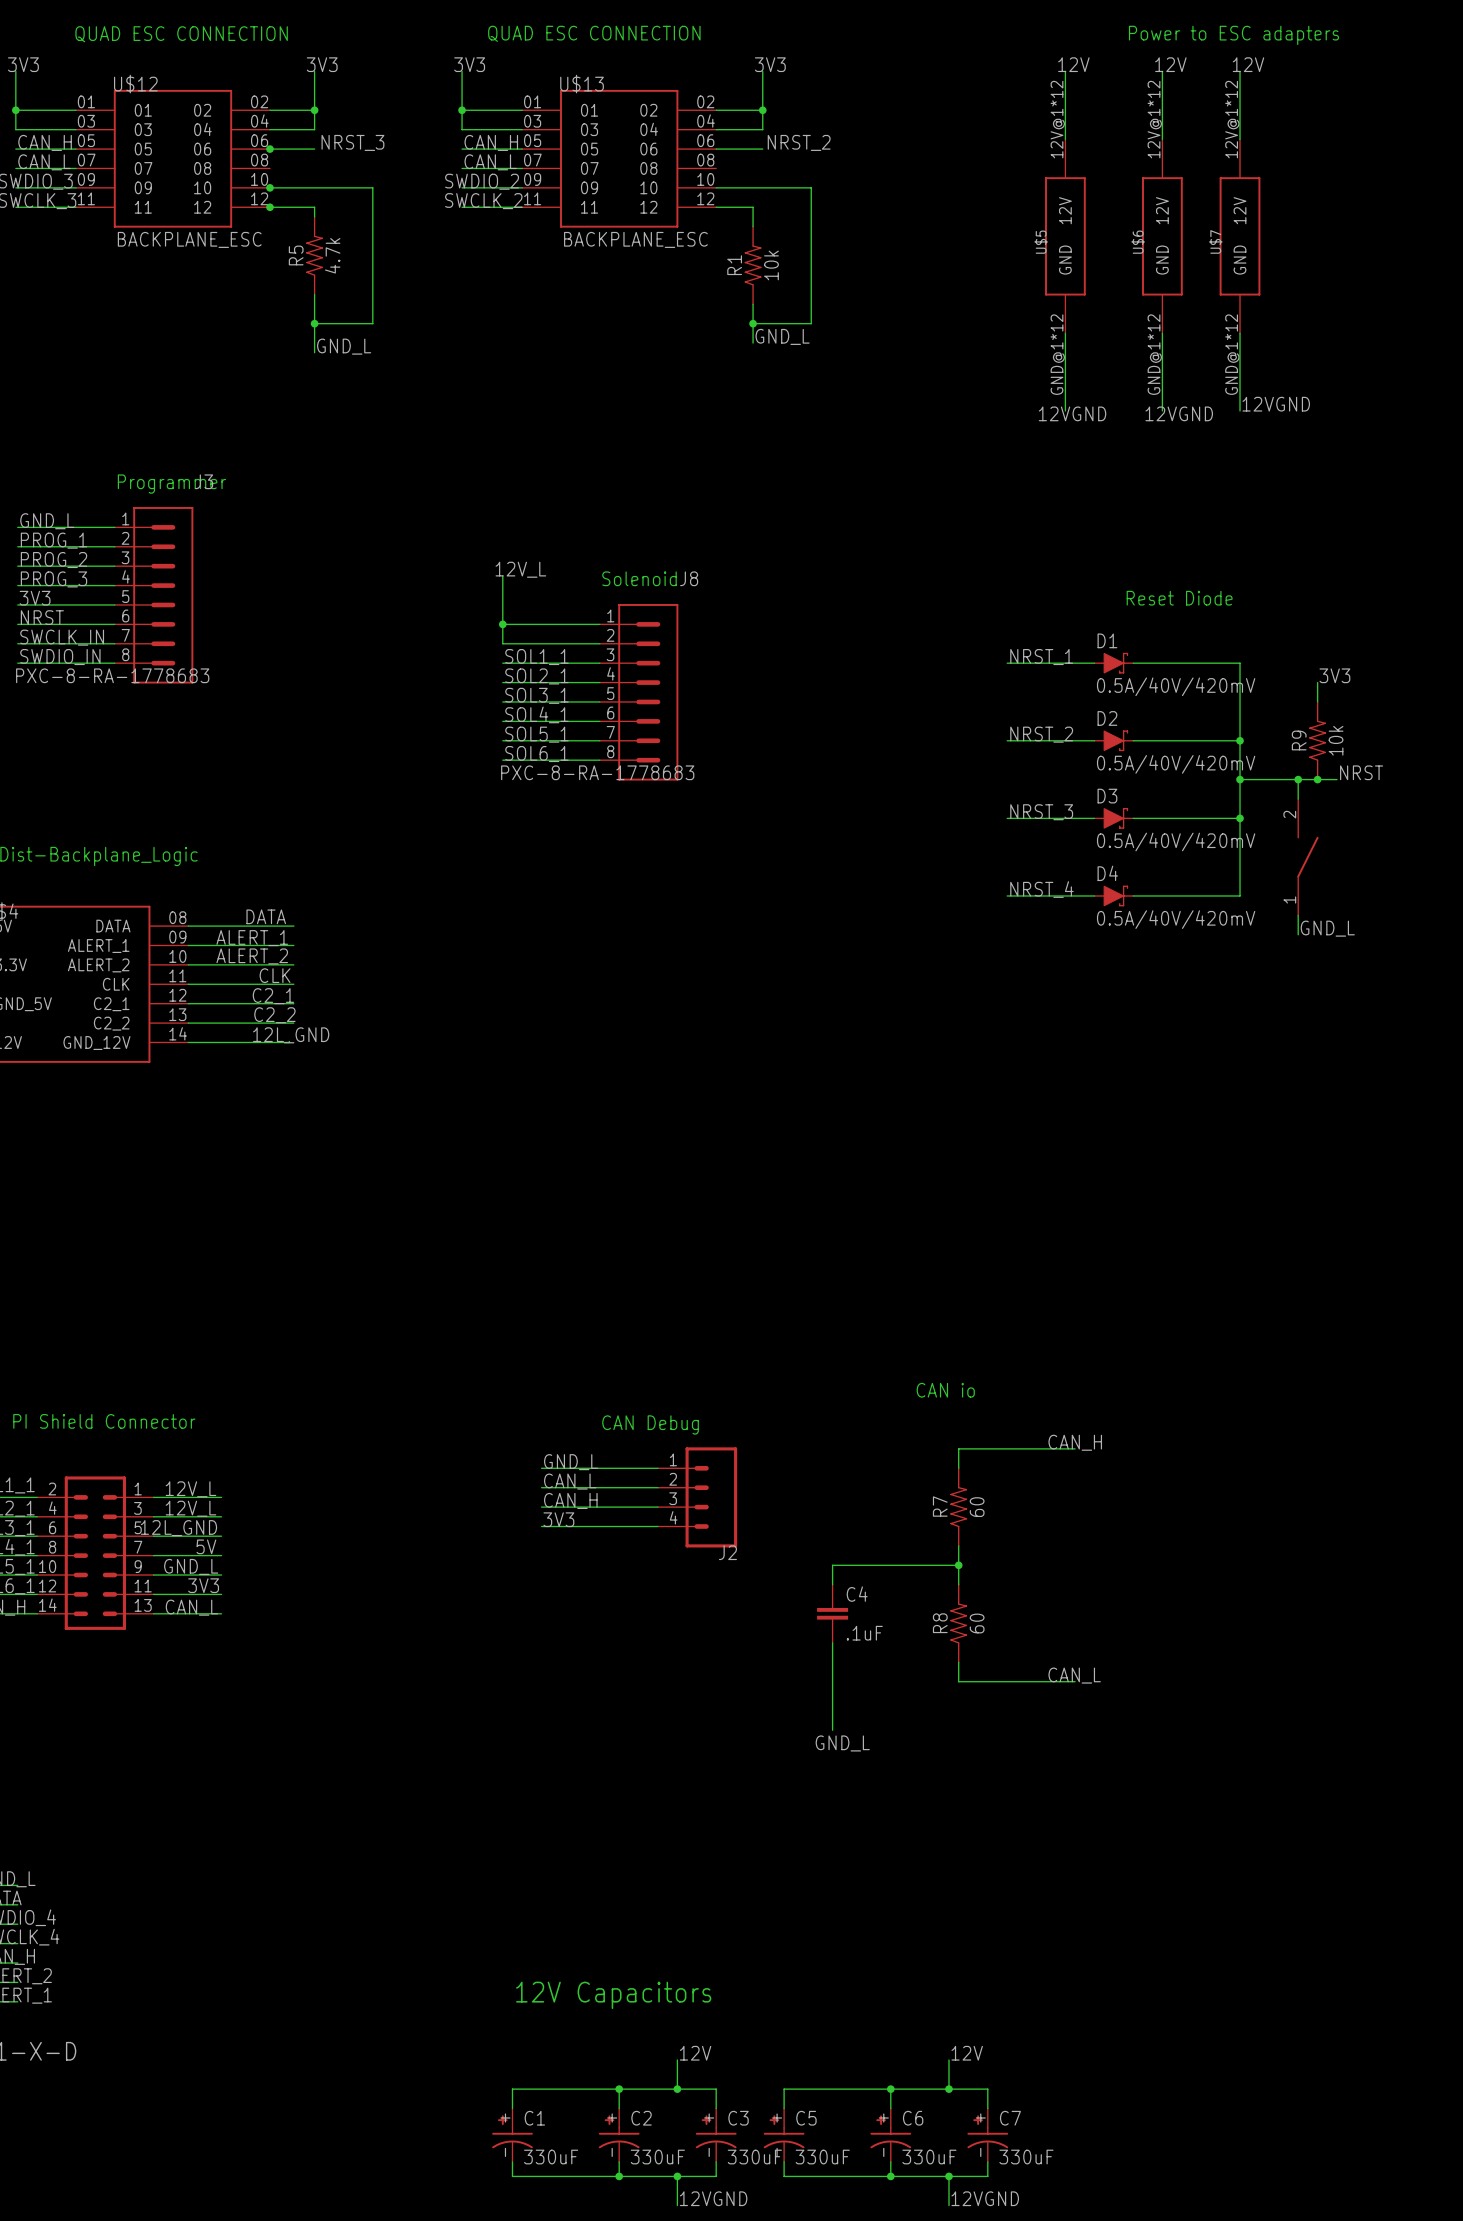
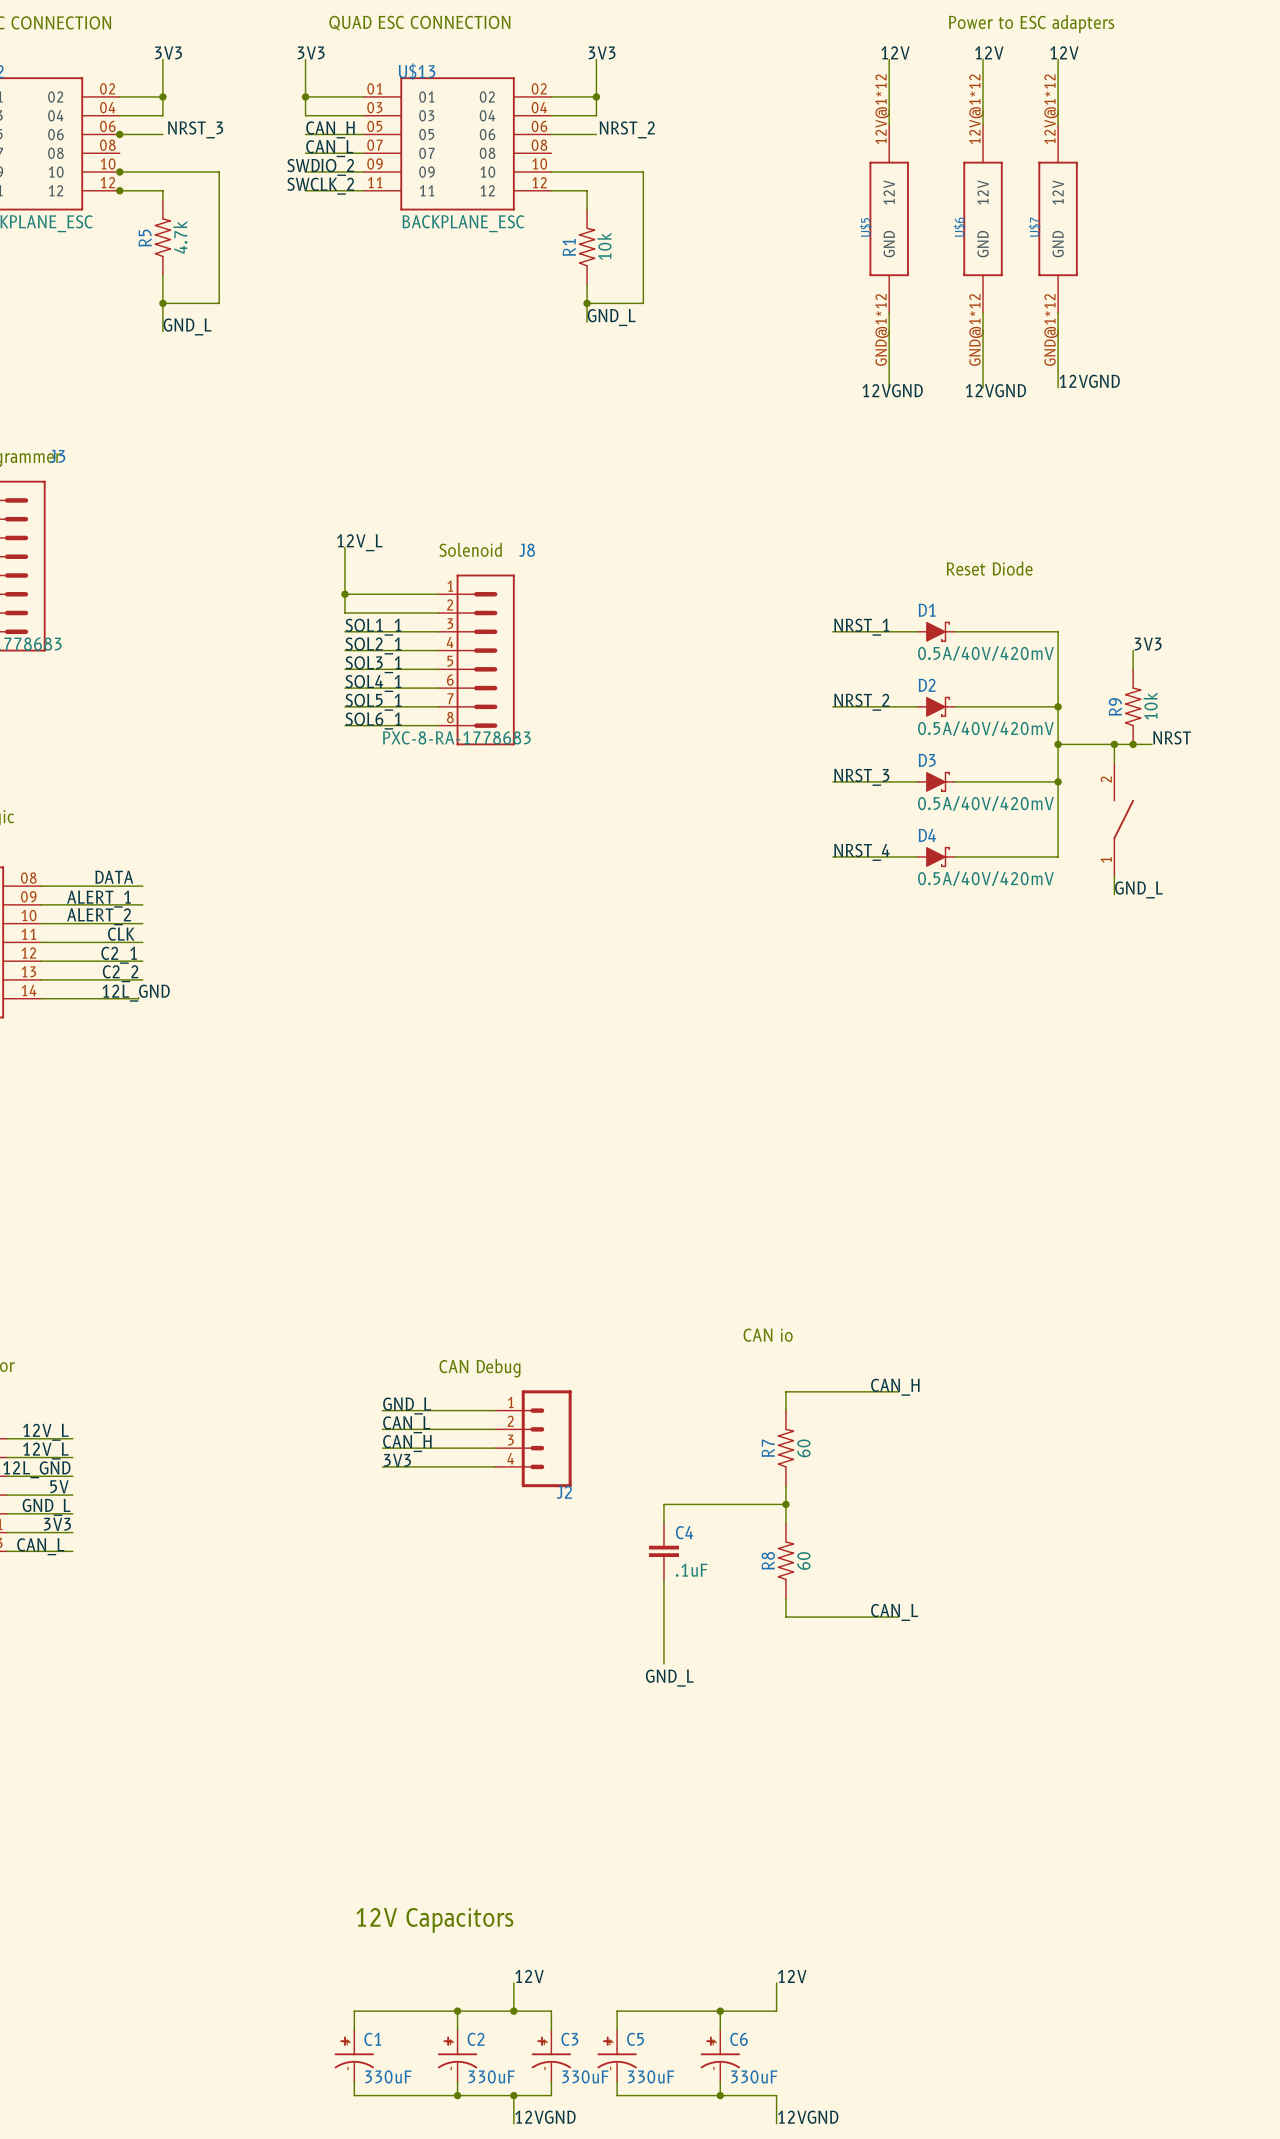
wire: (949, 2089) (987, 2089) (987, 2108) -> none
junction: (949, 2089) -> none
C7: 330uF (987, 2135) -> none
wire: (987, 2161) (987, 2176) (949, 2176) -> none
junction: (949, 2176) -> none

